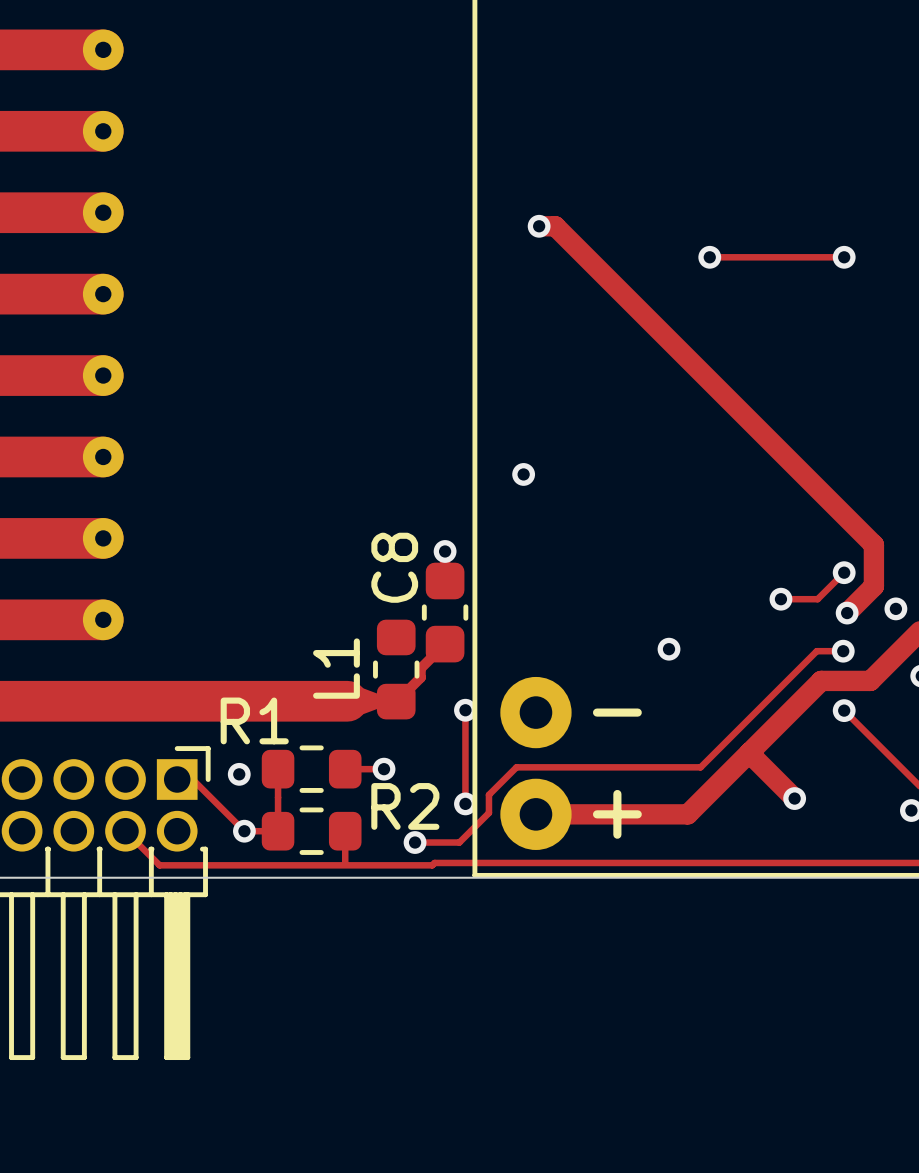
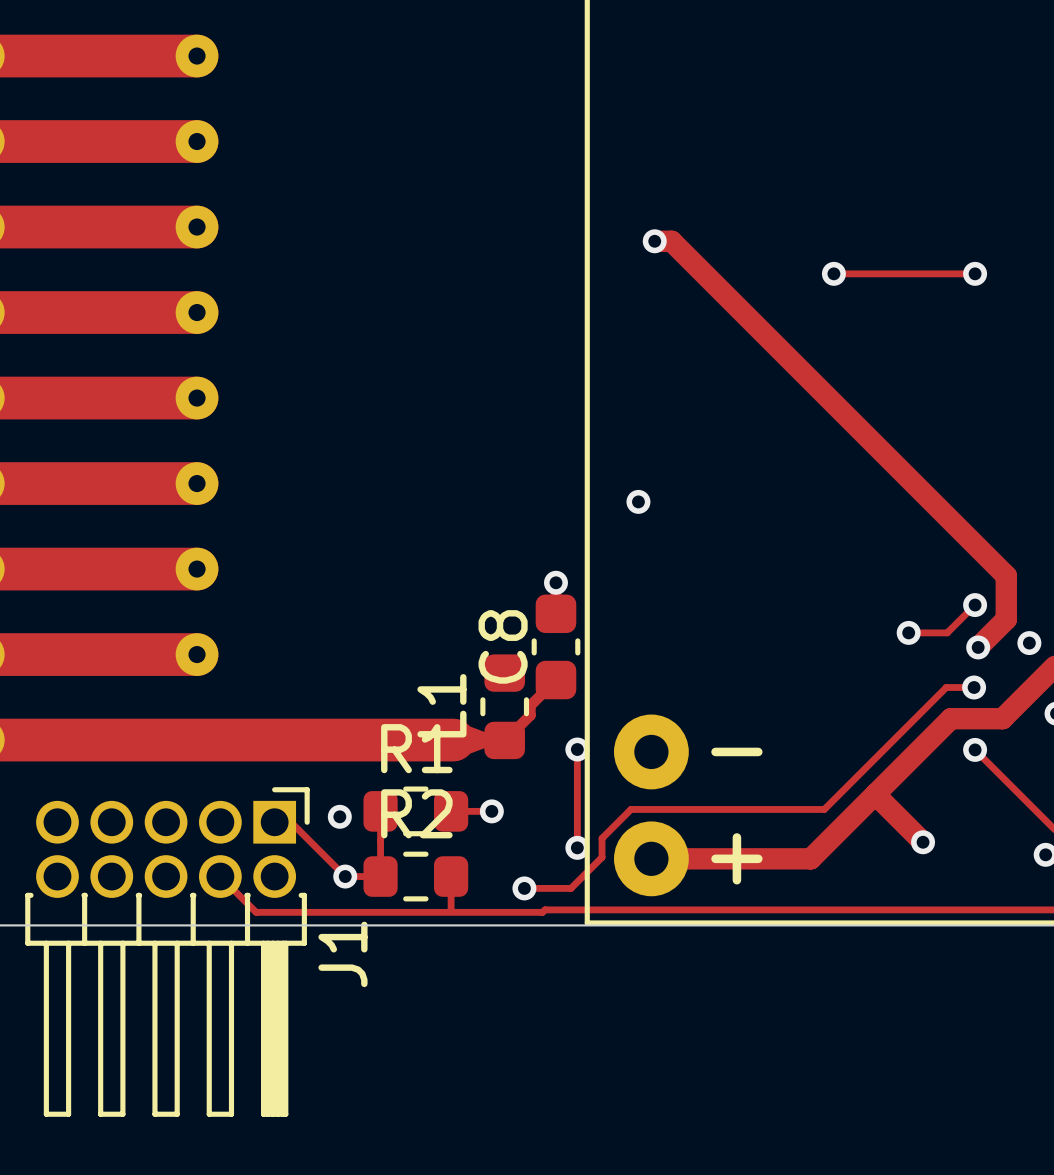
C8 name position: C8 (394, 567) -> C8 (503, 646)
via: (669, 649) -> none
R1 name position: R1 (254, 720) -> R1 (416, 748)
R2 name position: R2 (405, 806) -> R2 (416, 813)
J1 name: none -> J1 (342, 954)

